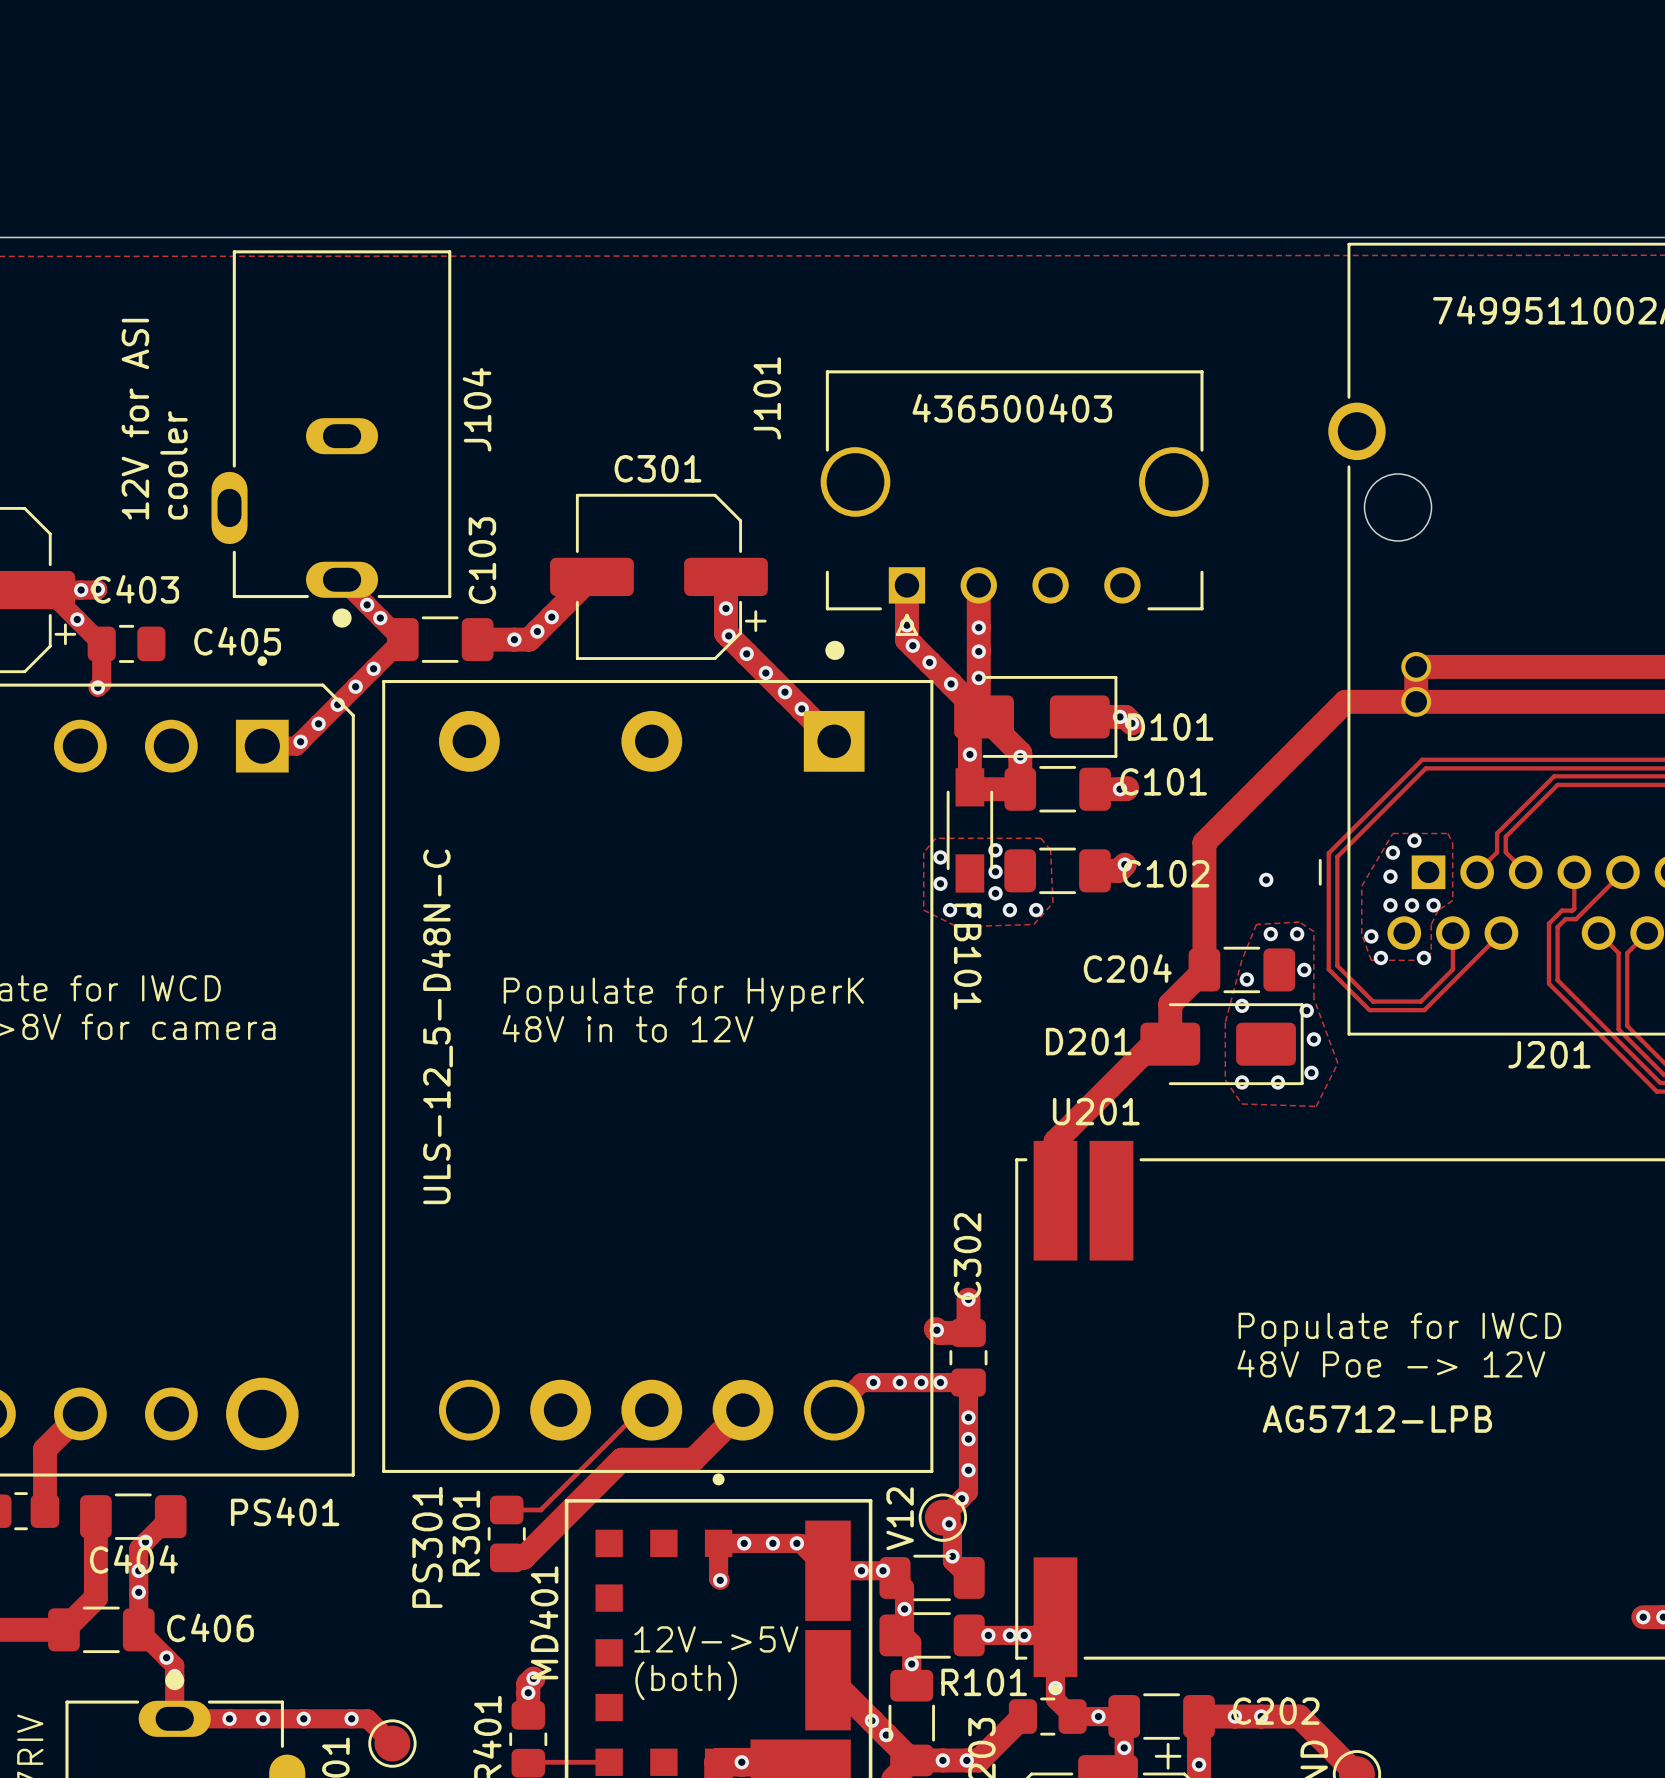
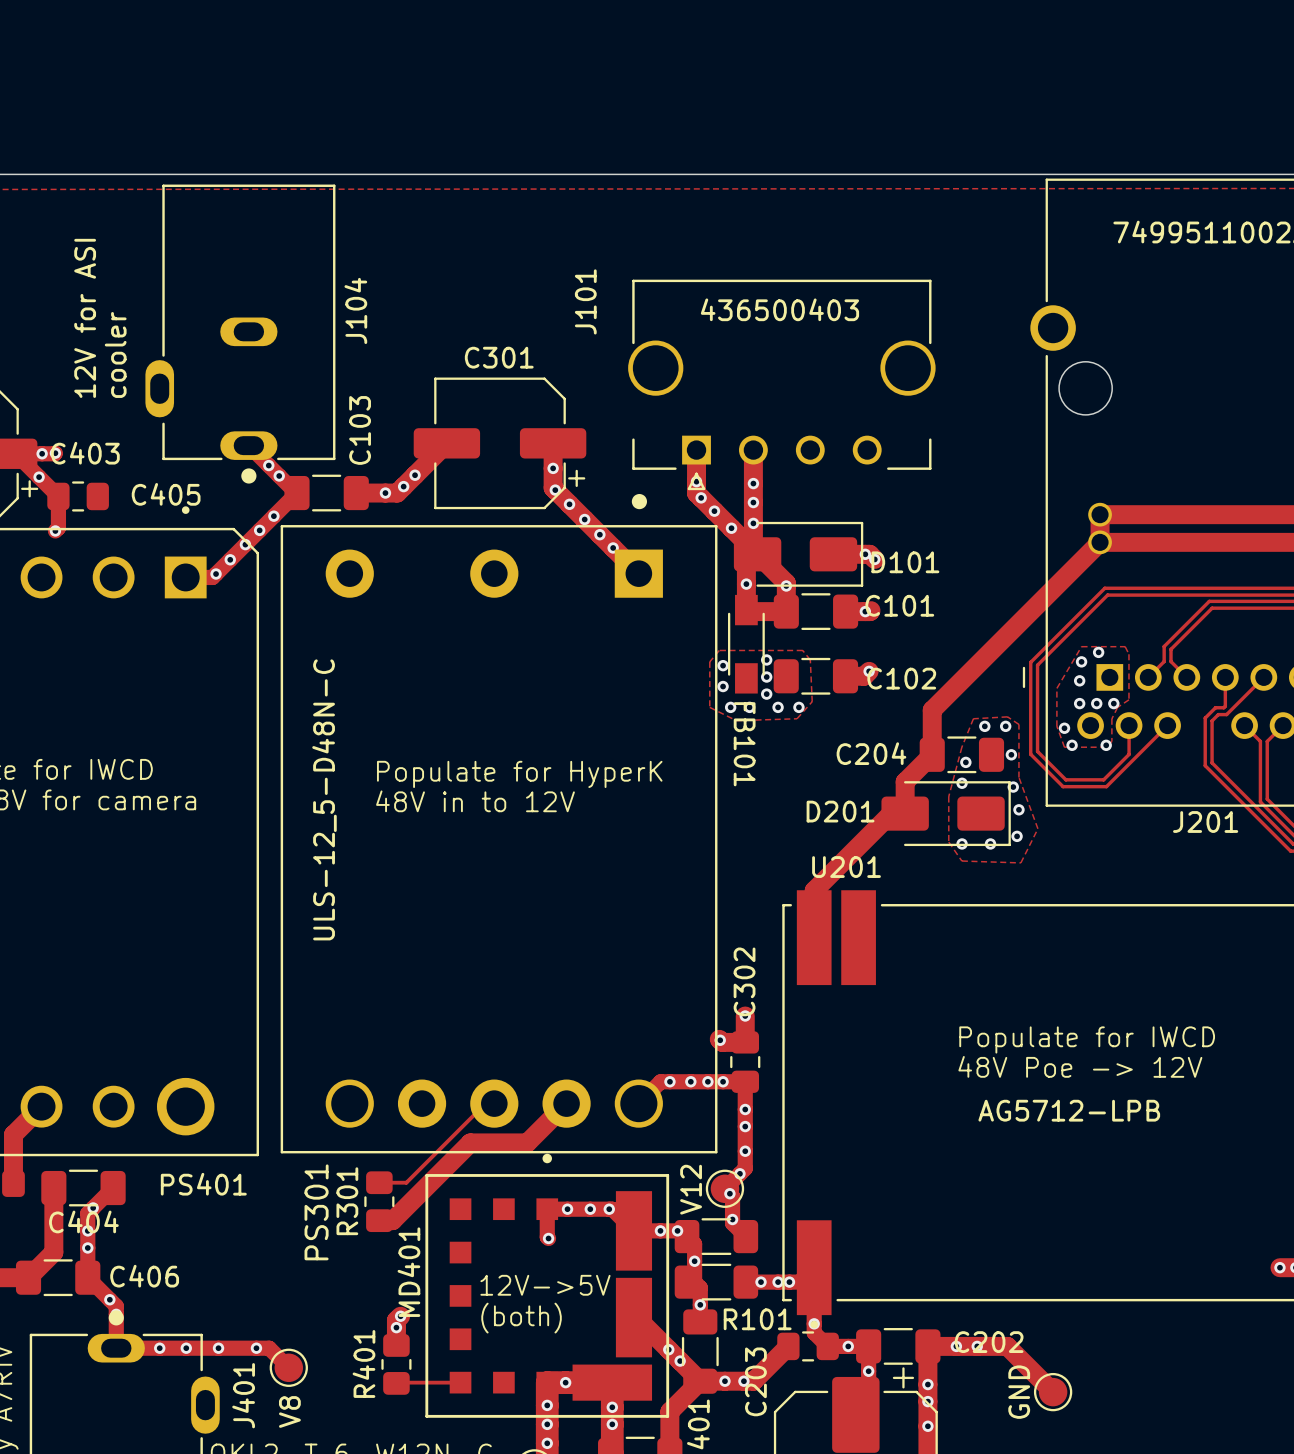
track: (1416, 701) (1345, 701) (1204, 842) (1204, 913) -> (1100, 542) (932, 710)
via: (1266, 879) -> none

